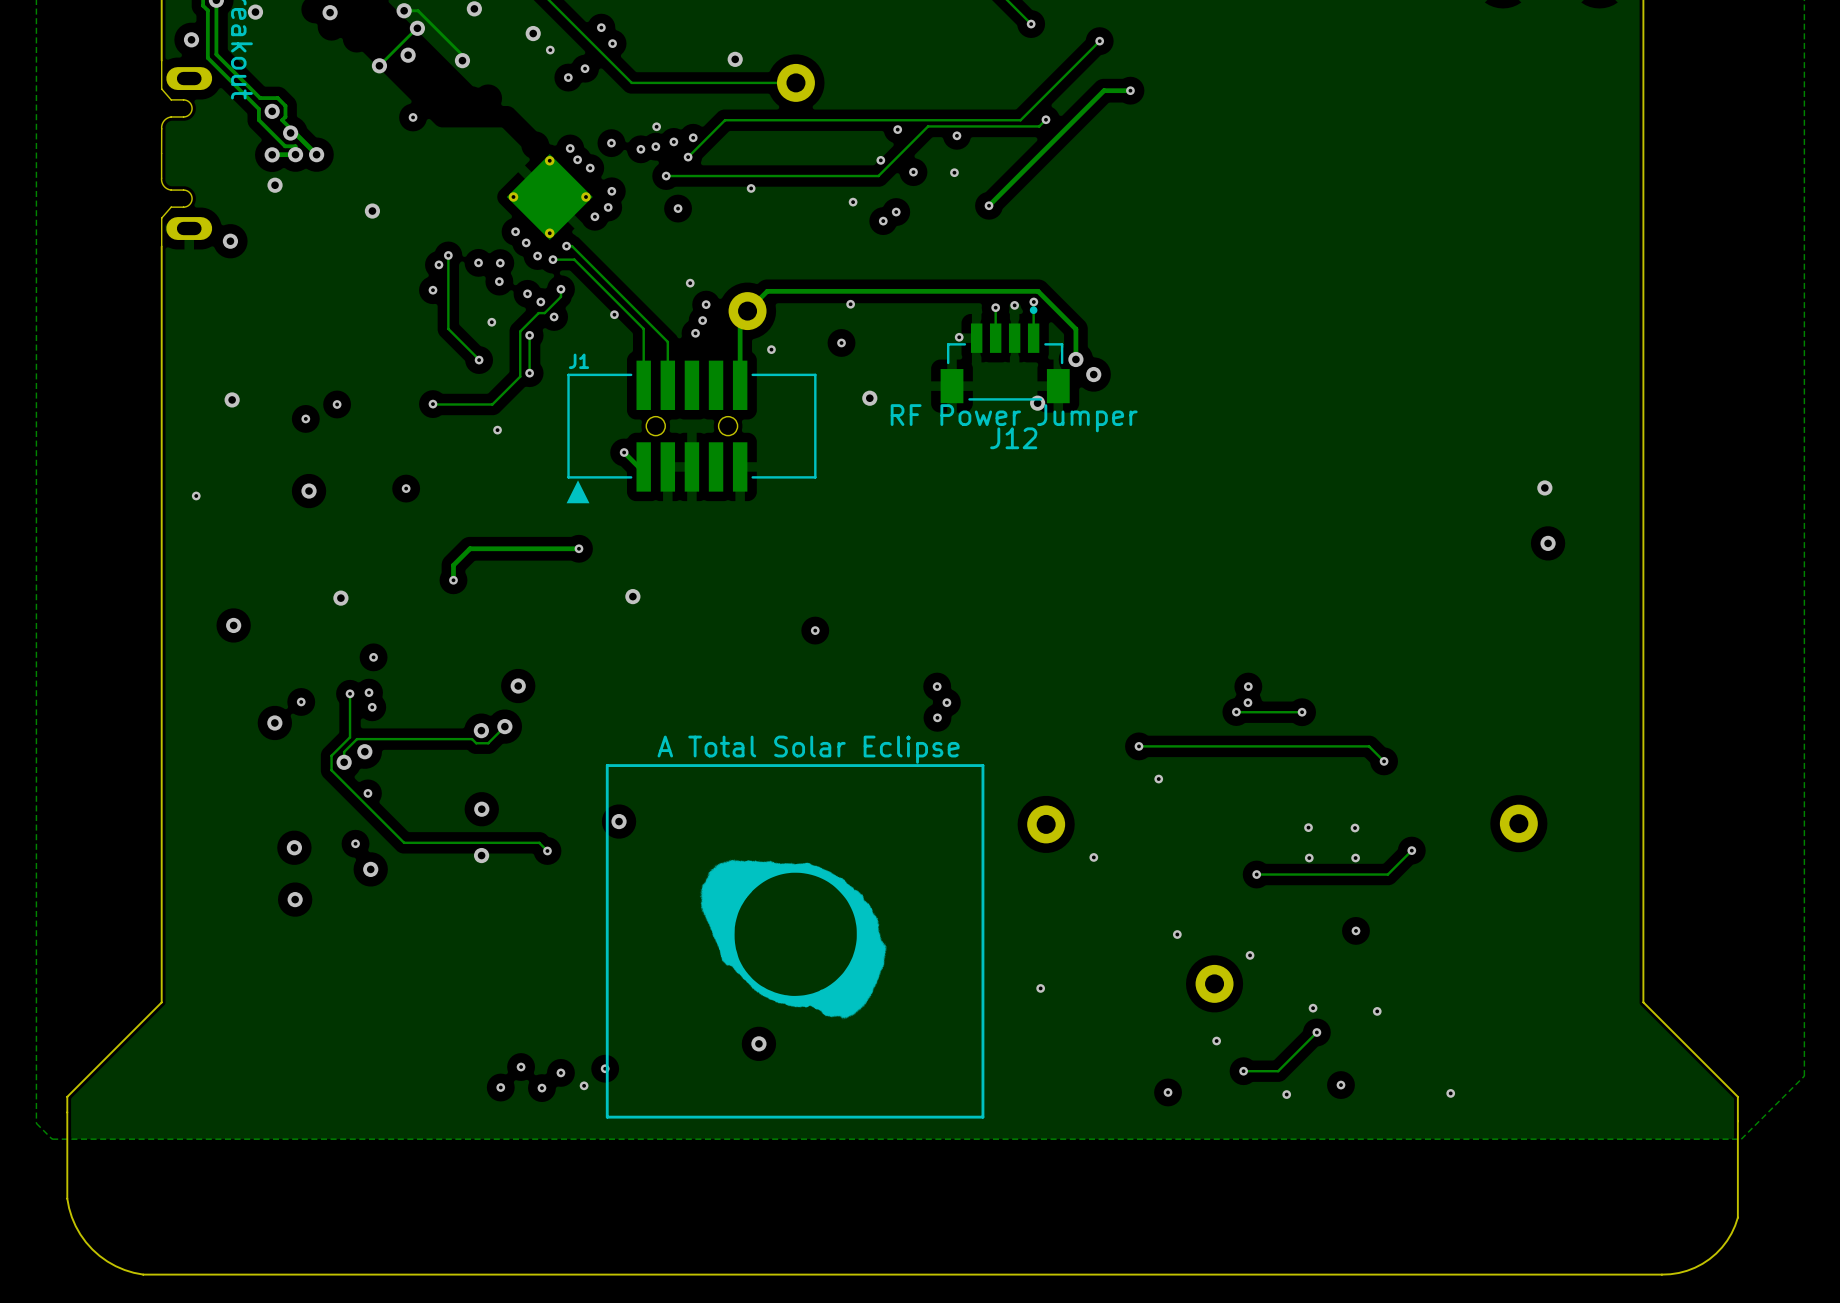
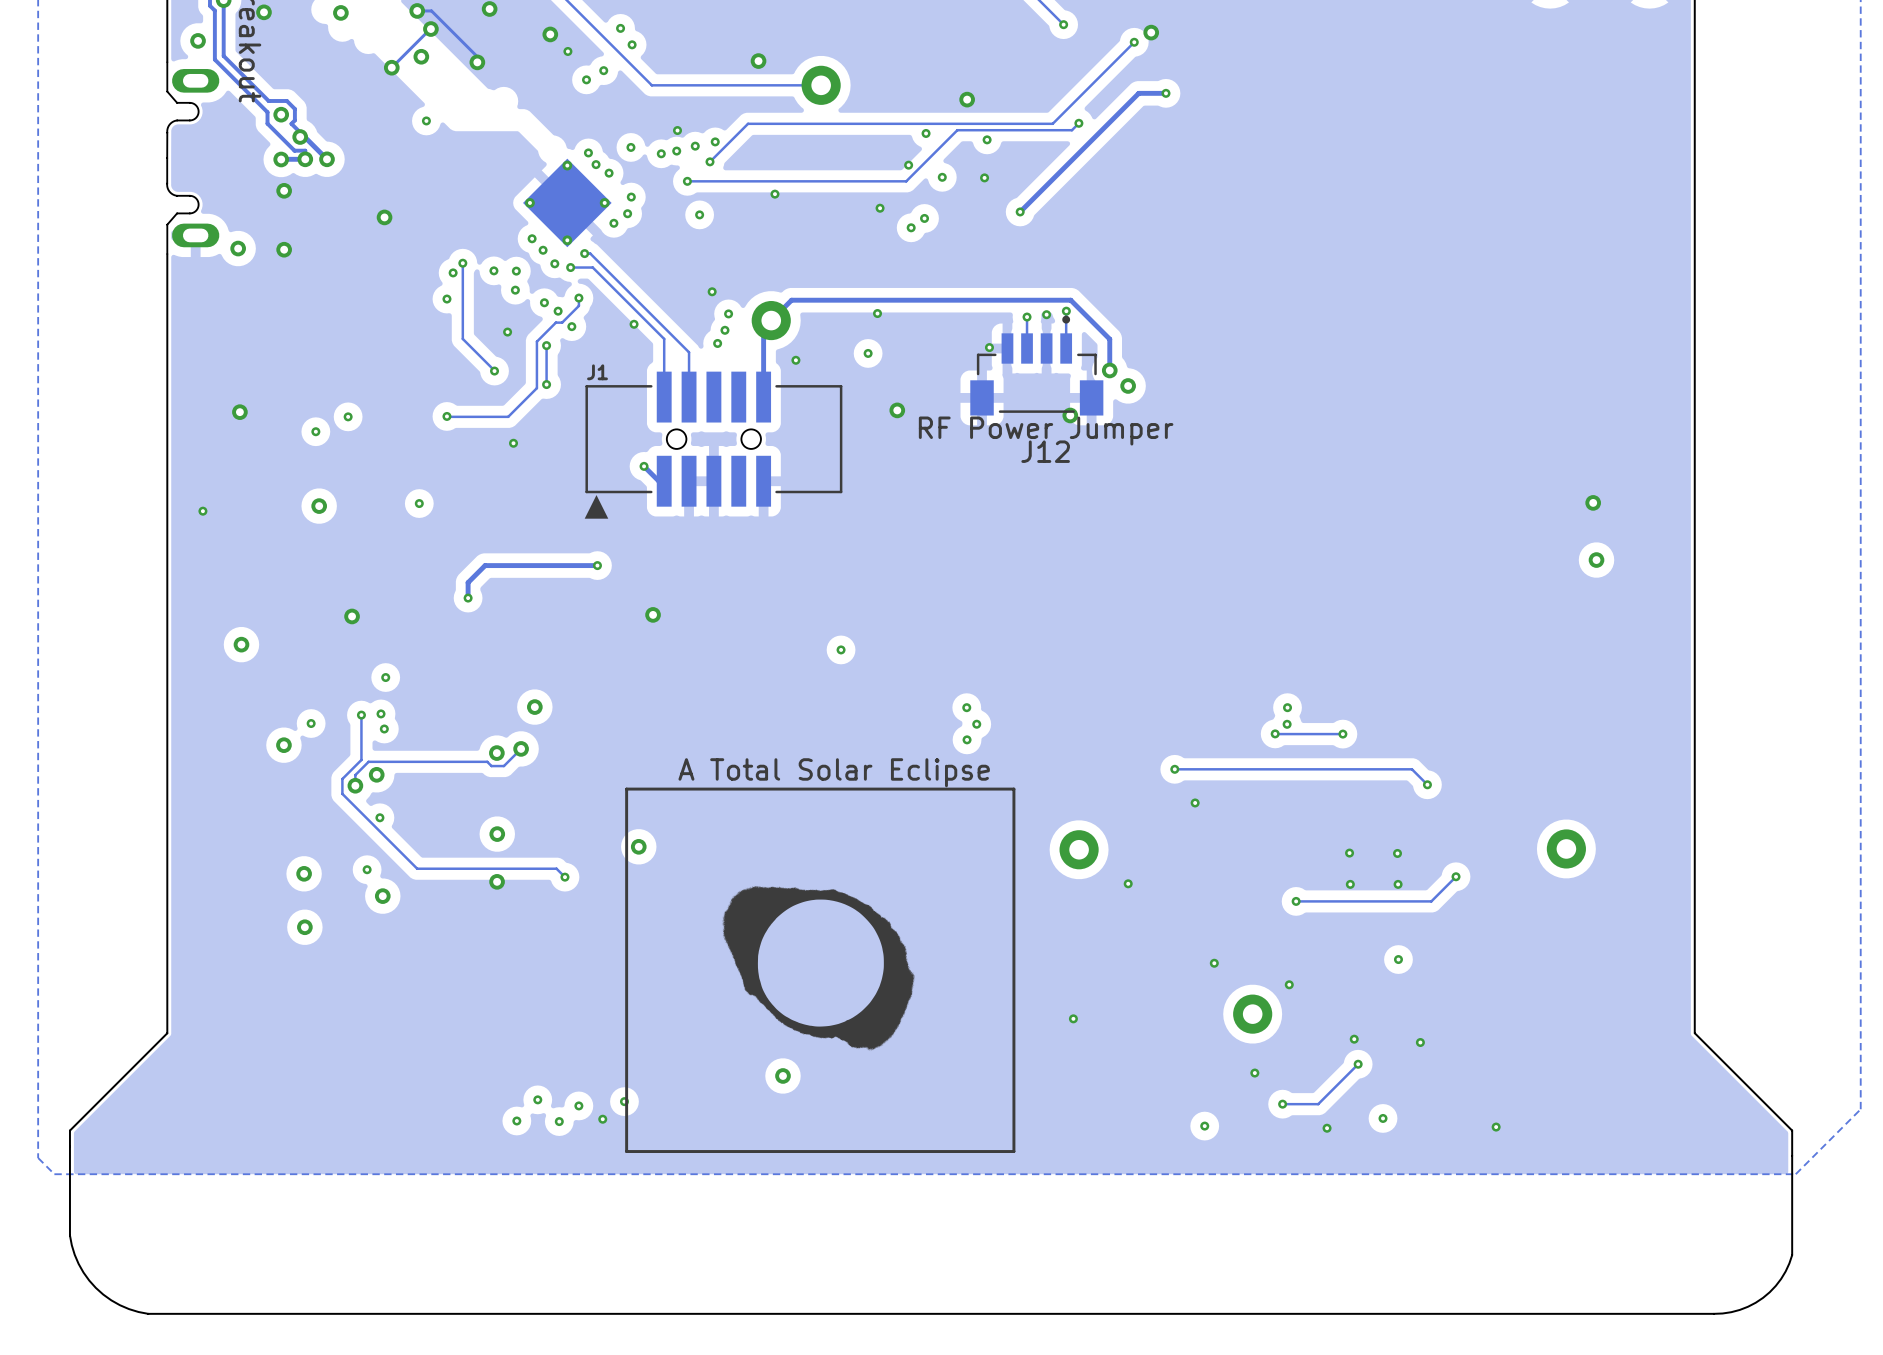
via: none -> (1151, 32)
via: none -> (967, 99)
via: none -> (284, 249)

